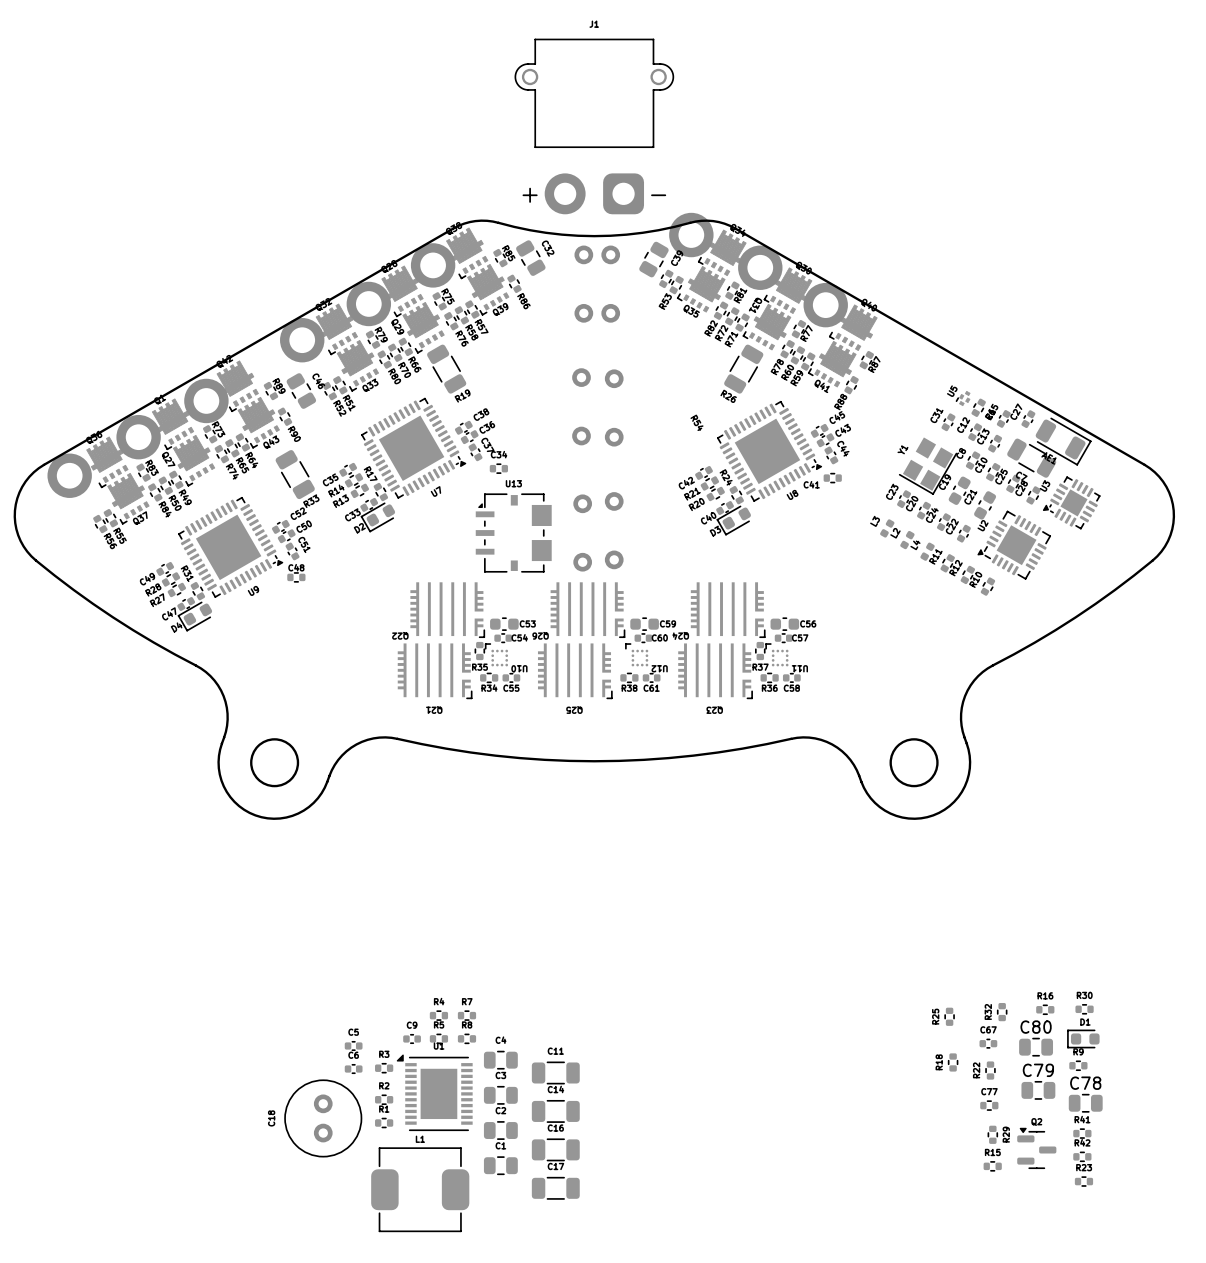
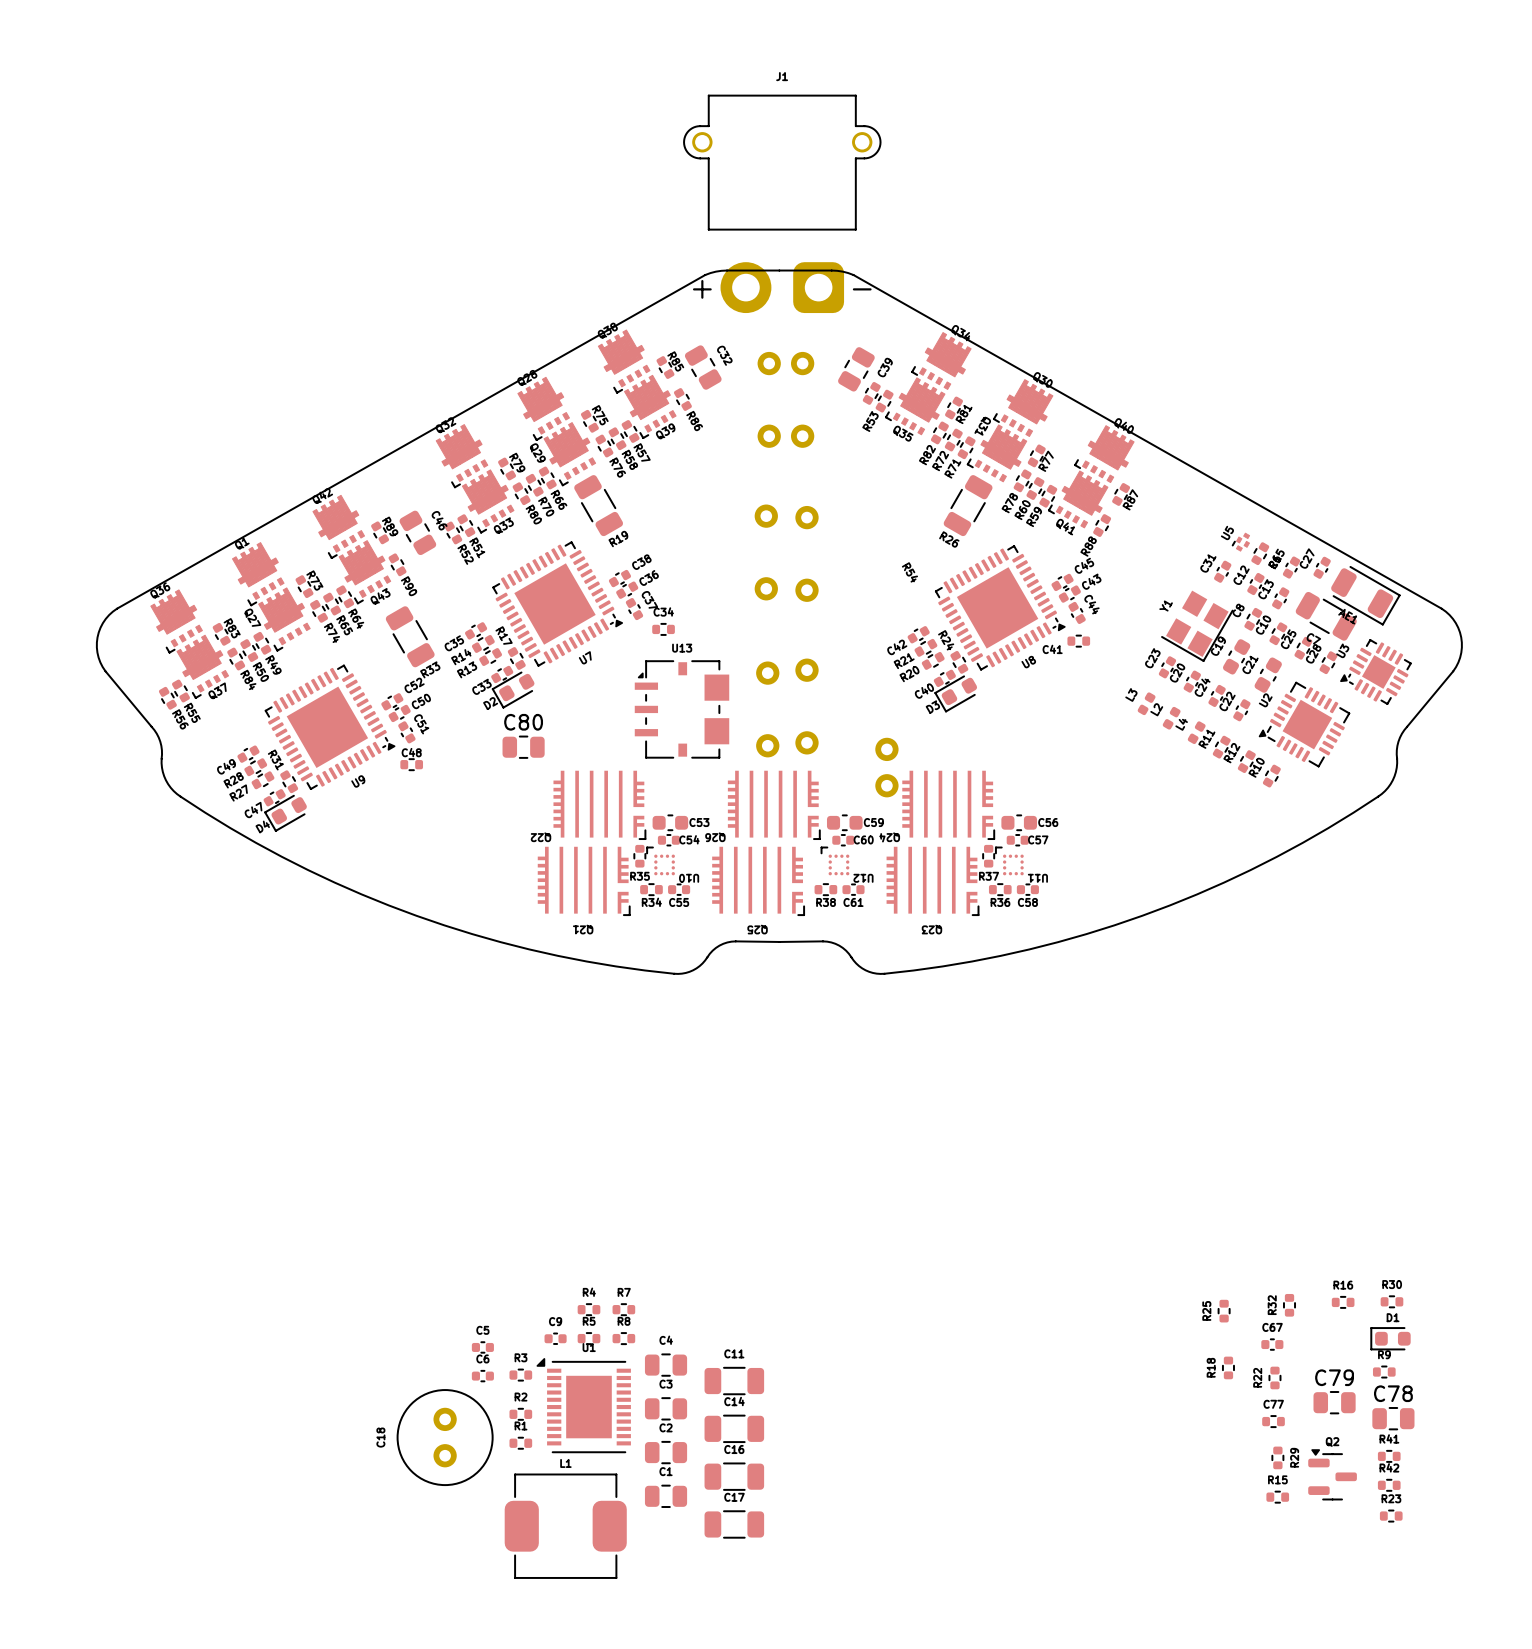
board edge: (498, 222) (545, 232) (594, 236) (642, 232) (701, 220) (718, 222) (730, 225) (1149, 468) (1163, 481) (1172, 504) (1173, 523) (1168, 541) (1157, 556) (1114, 590) (1055, 630) (987, 668) (974, 680) (965, 696) (961, 713) (962, 731) (969, 755) (967, 780) (958, 797) (949, 806) (927, 817) (908, 818) (884, 810) (867, 793) (853, 764) (842, 751) (826, 741) (803, 737) (693, 755) (594, 761) (495, 755) (391, 737) (379, 737) (361, 741) (342, 755) (331, 770) (321, 793) (303, 810) (280, 818) (261, 817) (249, 812) (230, 797) (219, 774) (219, 755) (225, 731) (227, 713) (225, 701) (218, 685) (201, 668) (113, 617) (73, 590) (31, 556) (20, 541) (15, 523) (14, 510) (19, 492) (29, 476) (43, 464) (453, 228) (475, 221) (498, 222) -> (727, 270) (705, 275) (117, 608) (109, 615) (100, 627) (97, 637) (96, 647) (100, 662) (156, 733) (161, 745) (162, 772) (173, 791) (205, 812) (255, 842) (334, 882) (416, 915) (500, 942) (586, 961) (678, 973) (696, 968) (715, 947) (727, 942) (827, 941) (842, 947) (862, 968) (880, 973) (942, 966) (1000, 955) (1058, 942) (1142, 915) (1197, 894) (1277, 856) (1353, 812) (1388, 787) (1395, 772) (1397, 745) (1401, 733) (1453, 671) (1460, 657) (1461, 642) (1460, 632) (1455, 623) (1445, 611) (853, 275) (831, 270) (727, 270)
part: (691, 235) -> none
part: (433, 265) -> none
part: (760, 267) -> none
part: (368, 303) -> none
part: (825, 305) -> none
part: (302, 340) -> none
part: (206, 400) -> none
part: (138, 437) -> none
part: (69, 475) -> none
part: none -> (886, 767)
round board edge: [250, 738, 300, 788] -> none
round board edge: [889, 738, 939, 788] -> none
C80 position: (1036, 1047) -> (523, 747)

